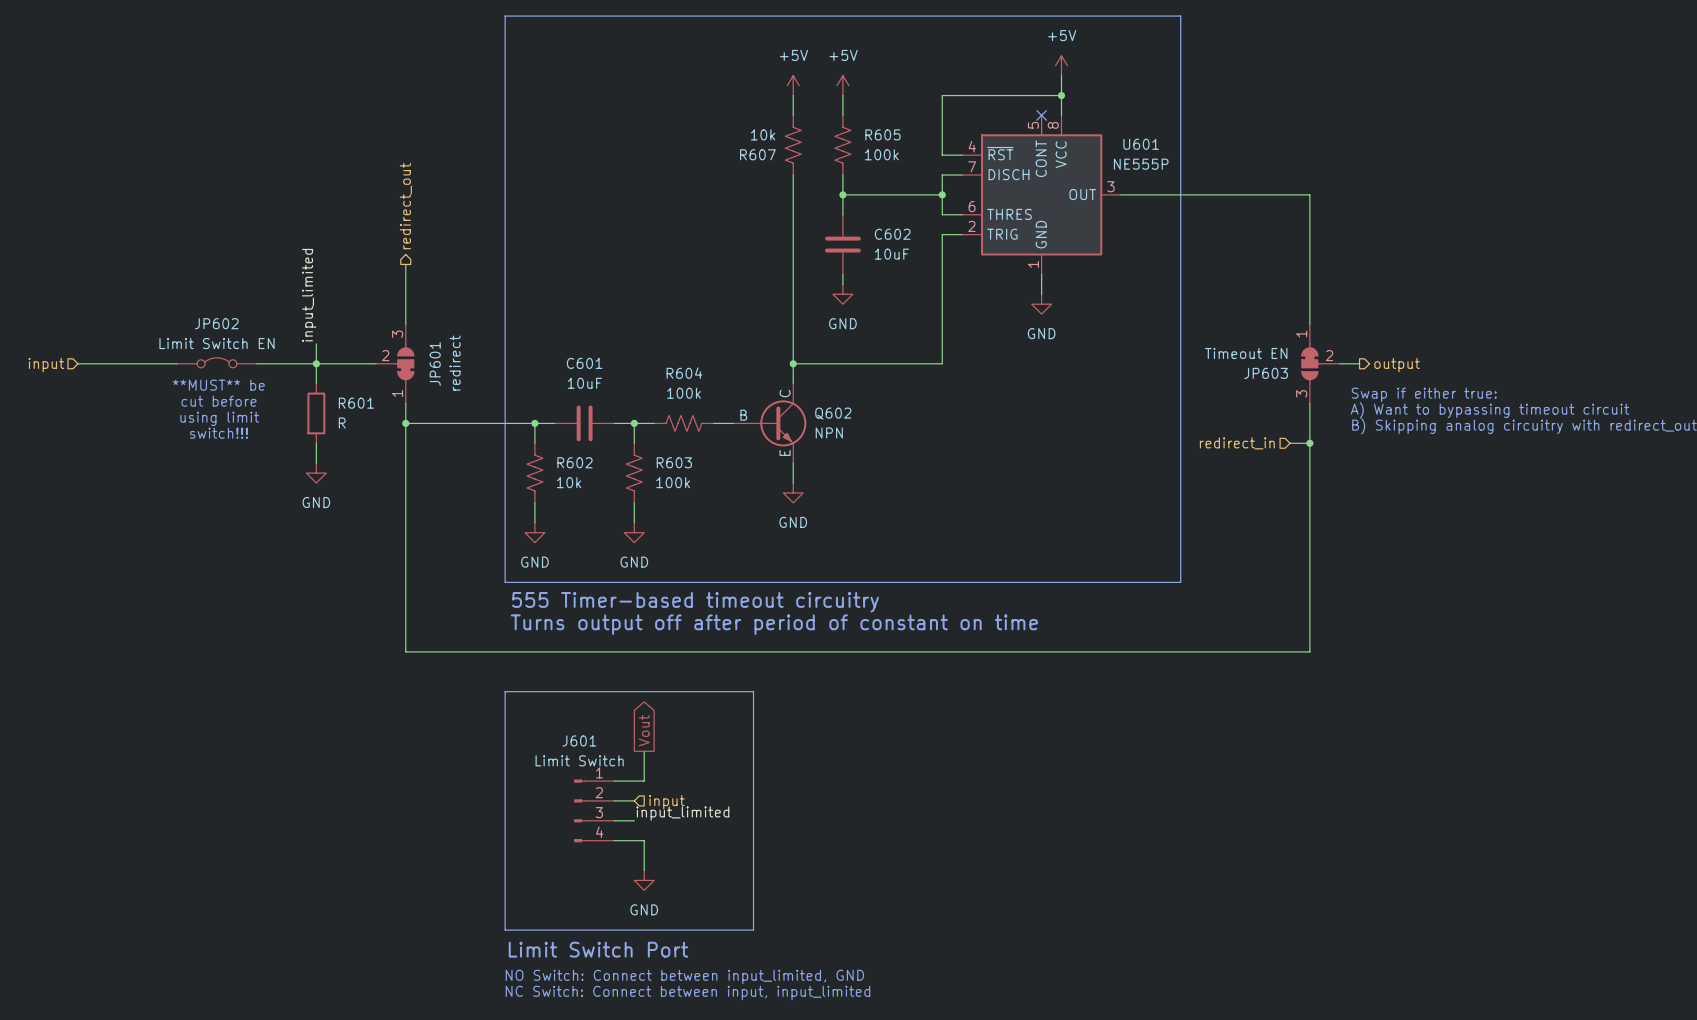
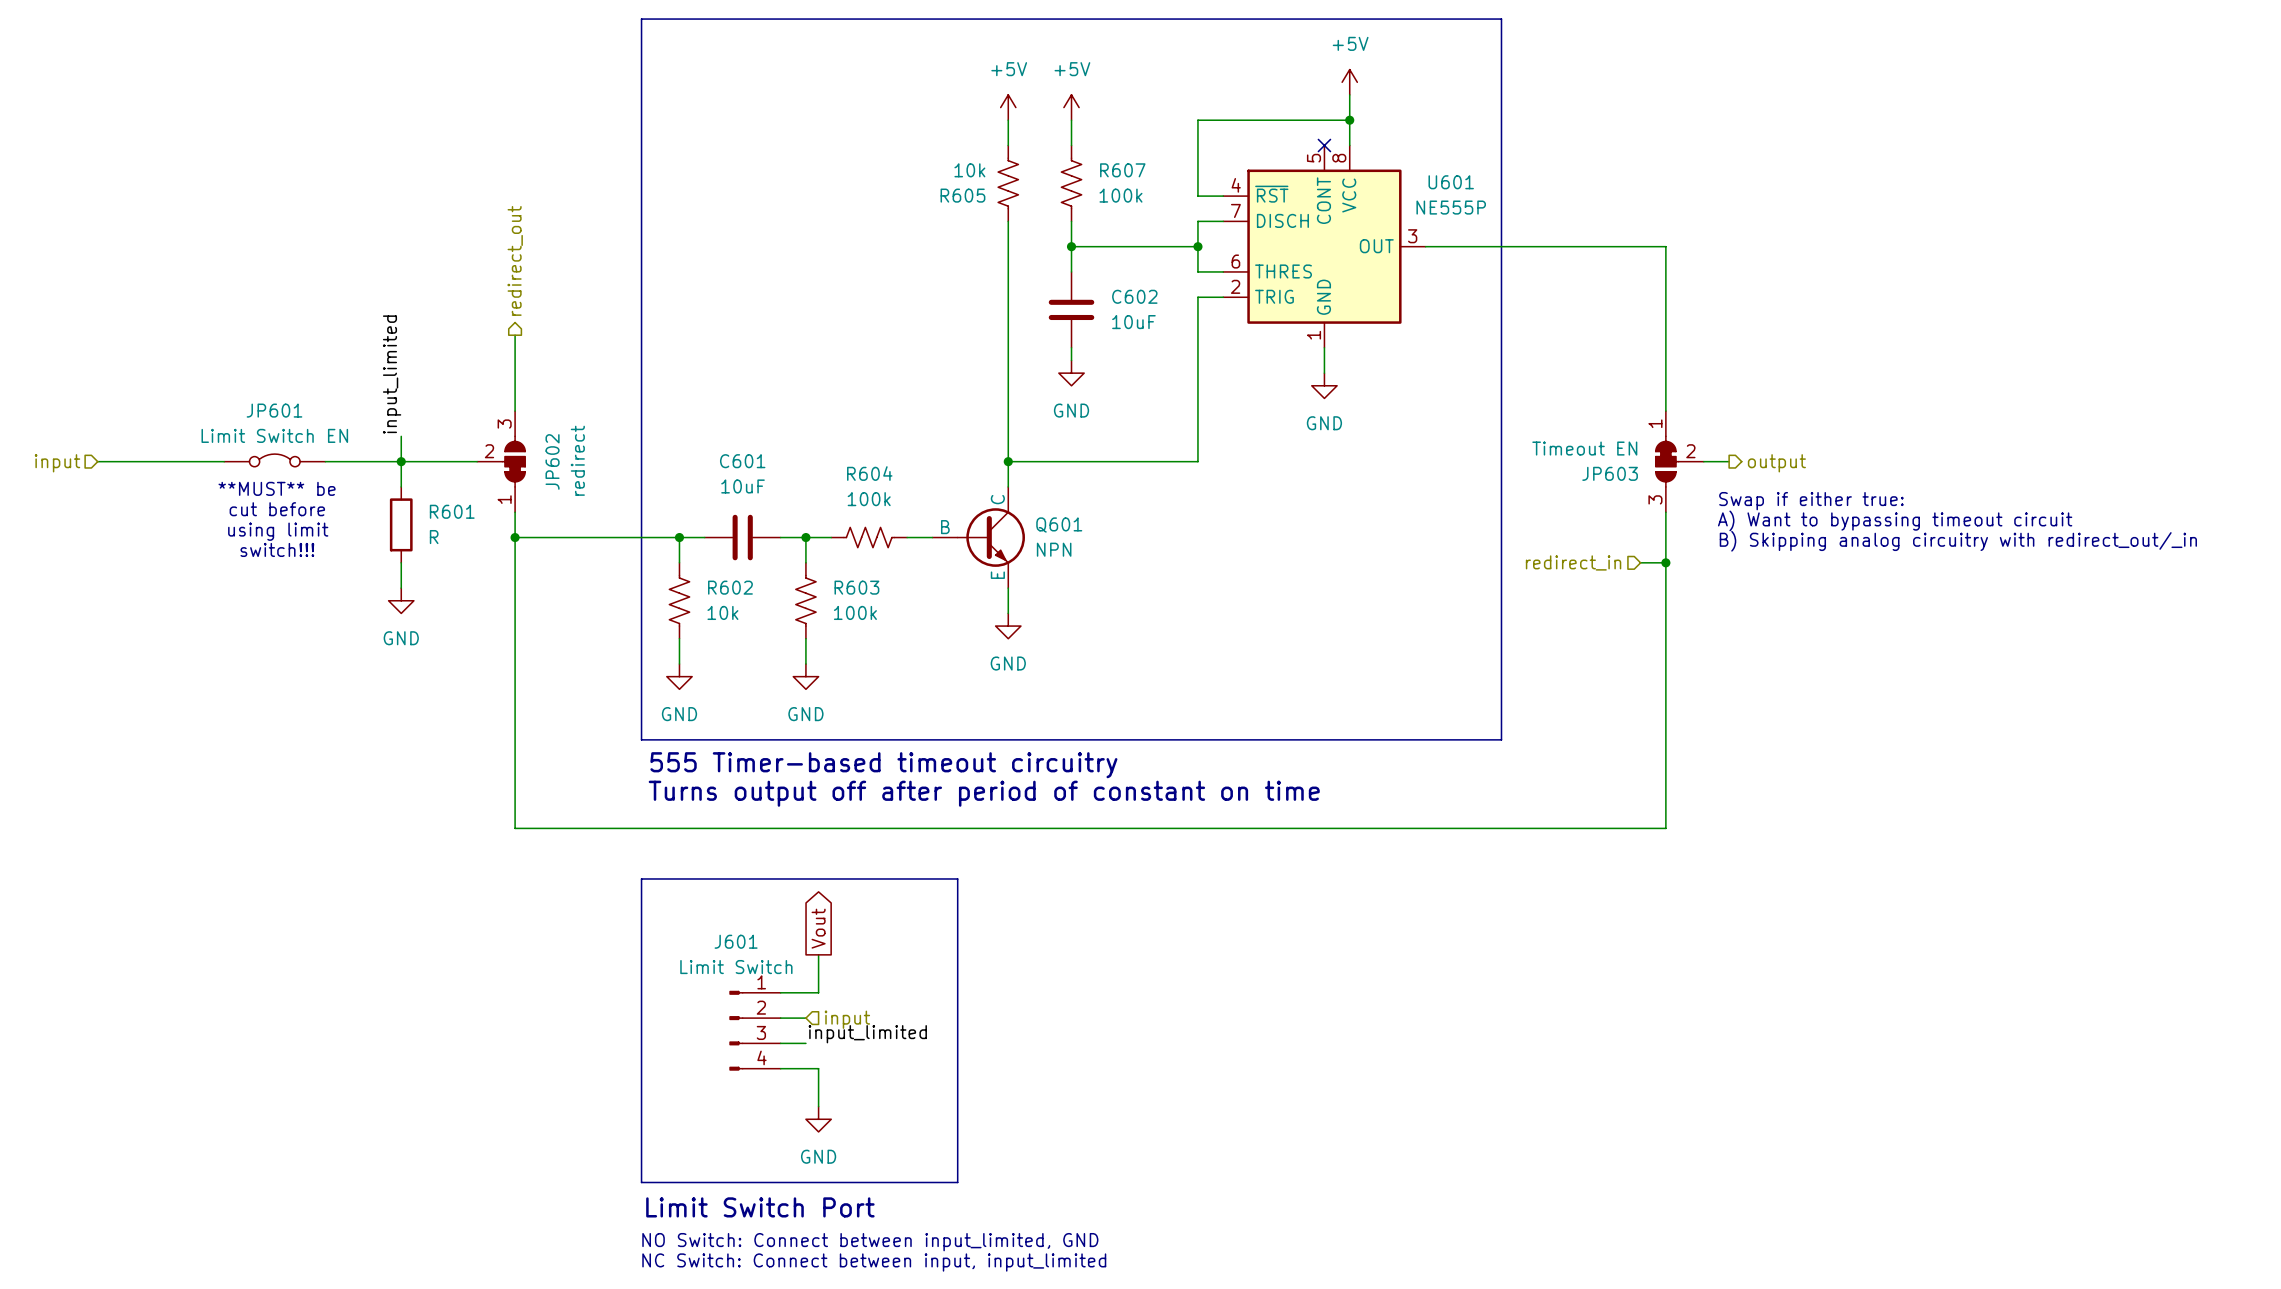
R605 name: R605 (882, 134) -> R607 (1122, 170)
R607 name: R607 (757, 154) -> R605 (962, 195)
JP602 name: JP602 (216, 323) -> JP601 (274, 410)
JP601 name: JP601 (435, 364) -> JP602 (552, 461)
Q602 name: Q602 (833, 413) -> Q601 (1059, 525)

